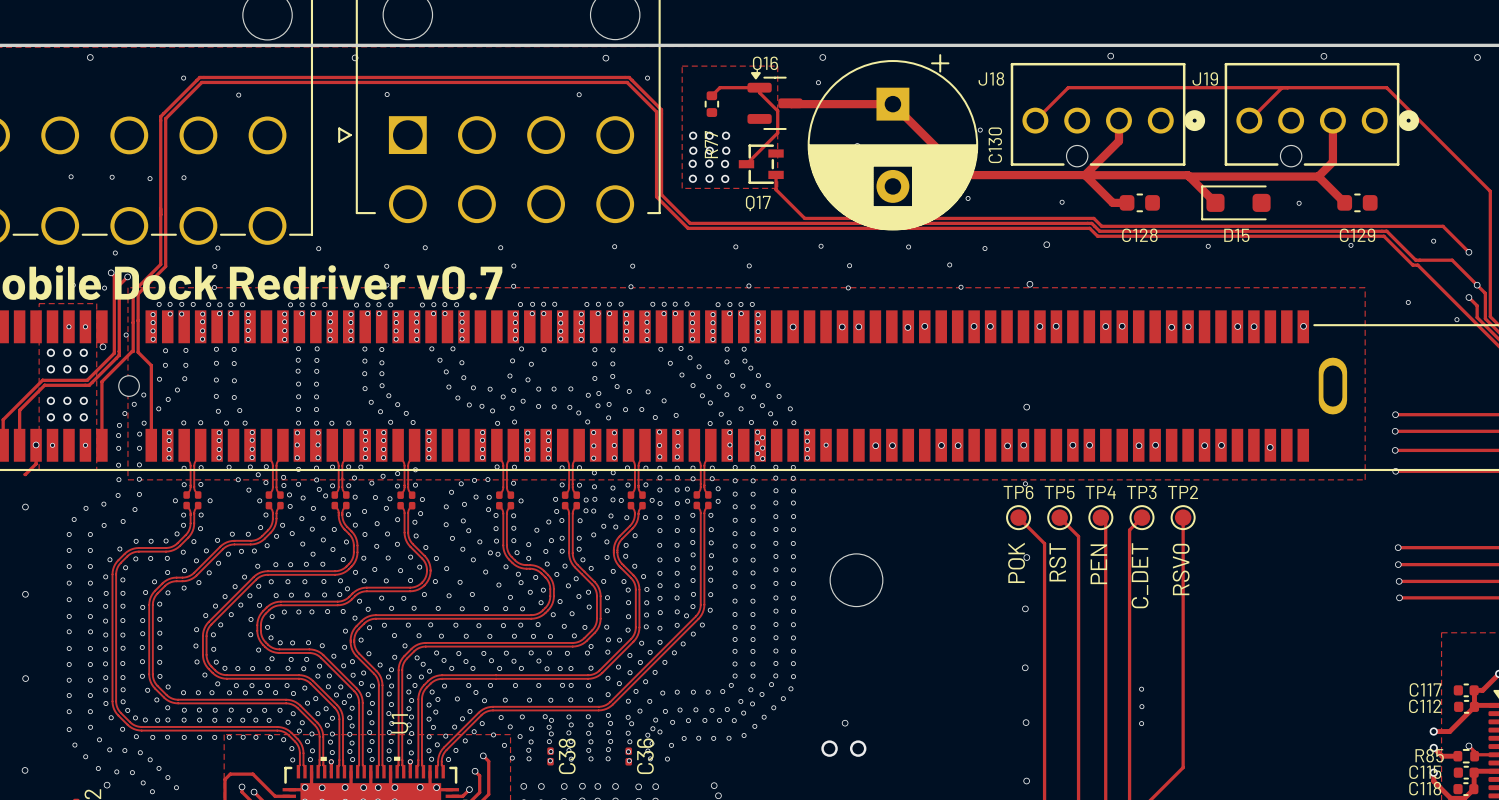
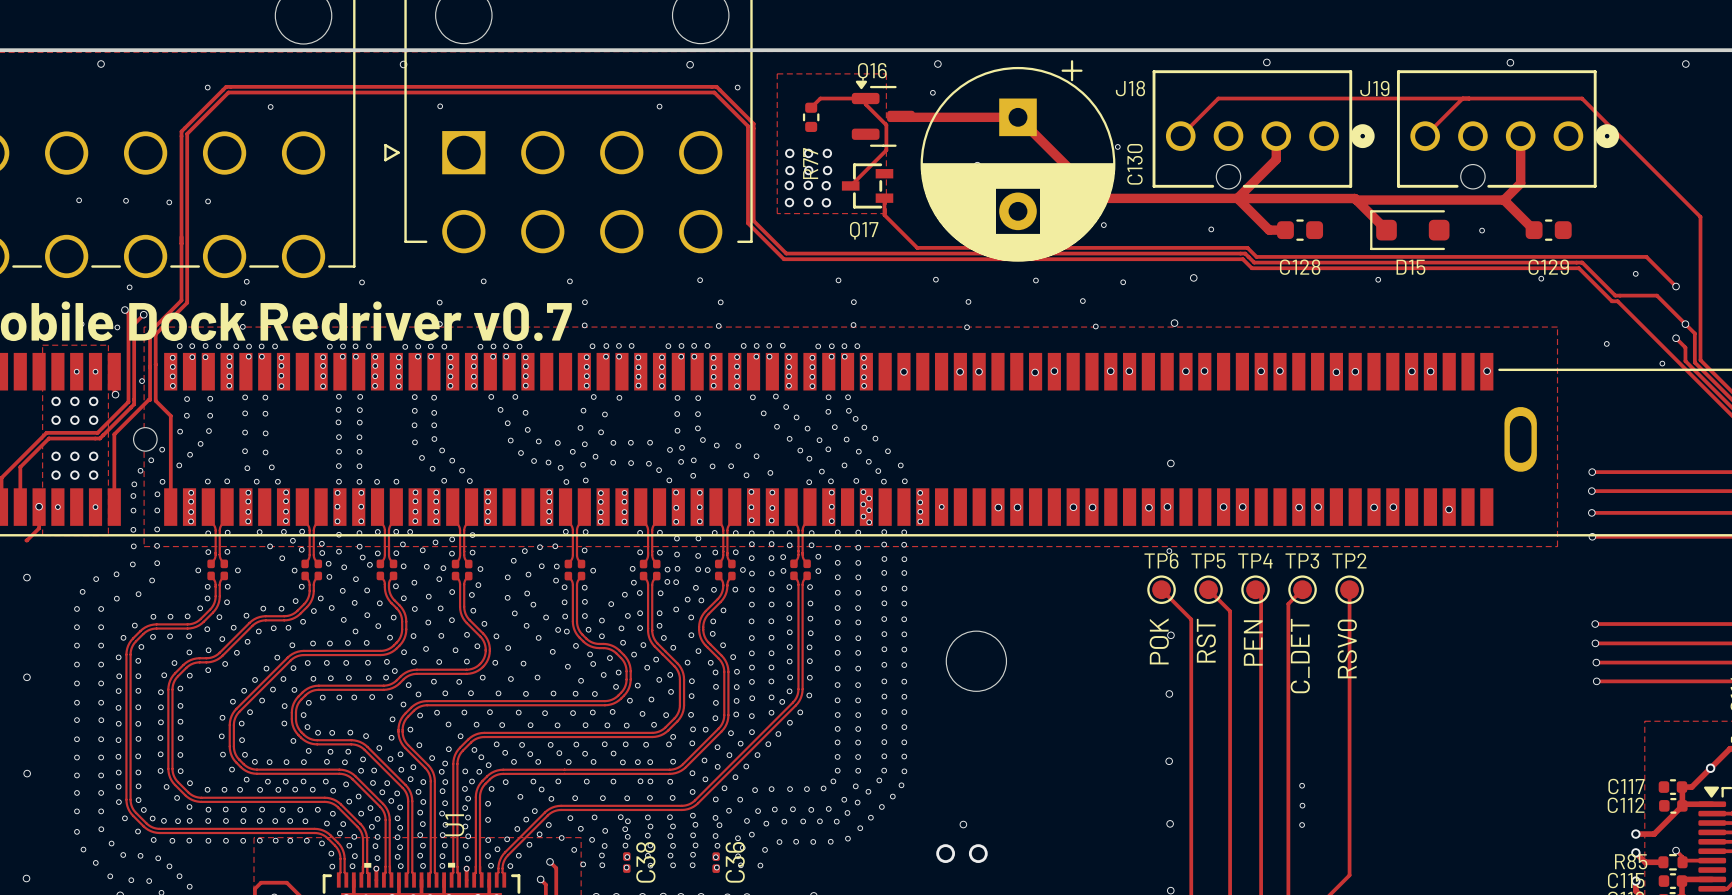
via: (437, 699) -> none
via: (435, 712) -> none
via: (433, 727) -> none
via: (652, 728) -> none

